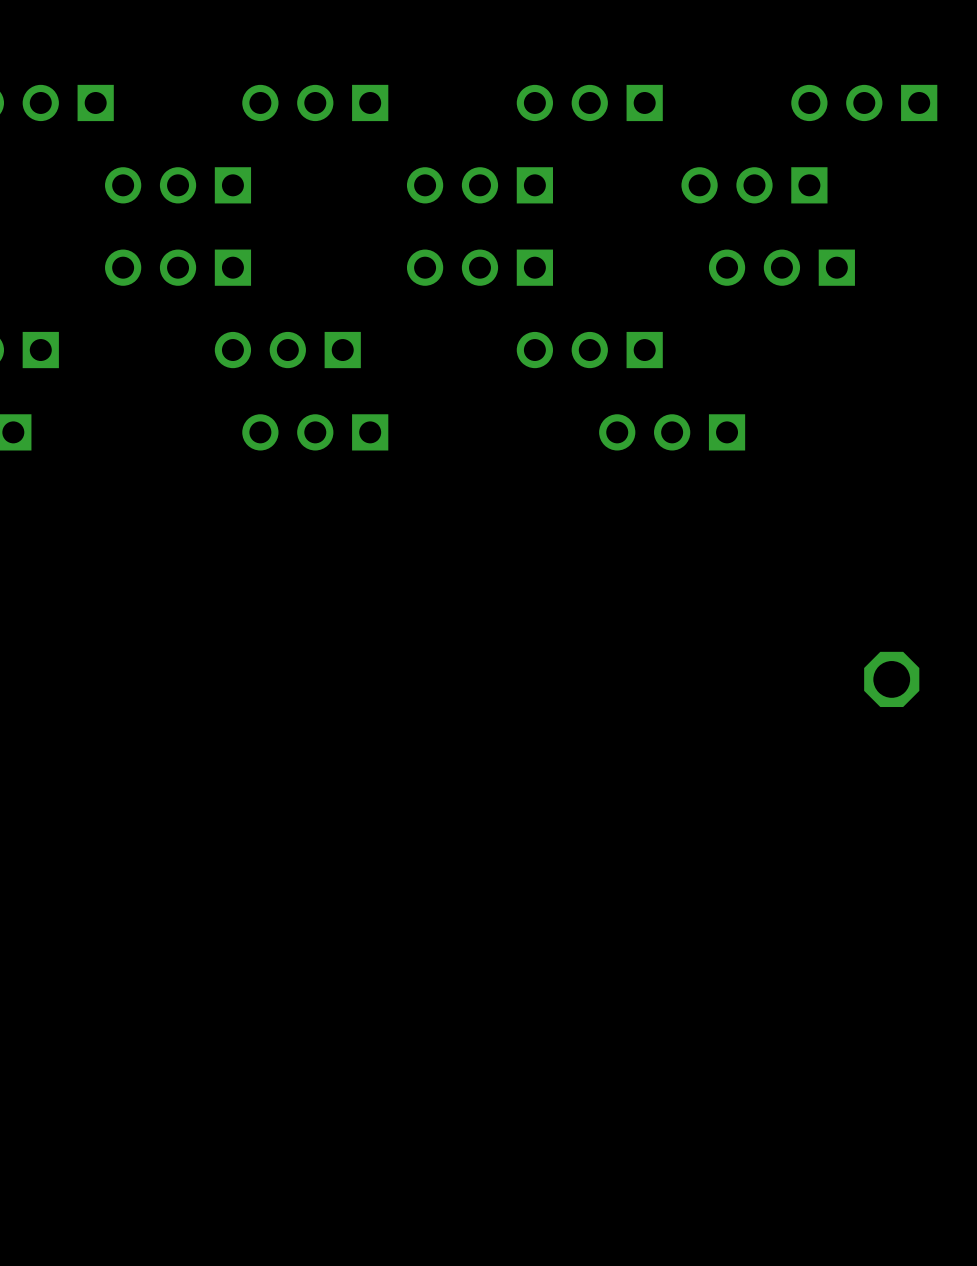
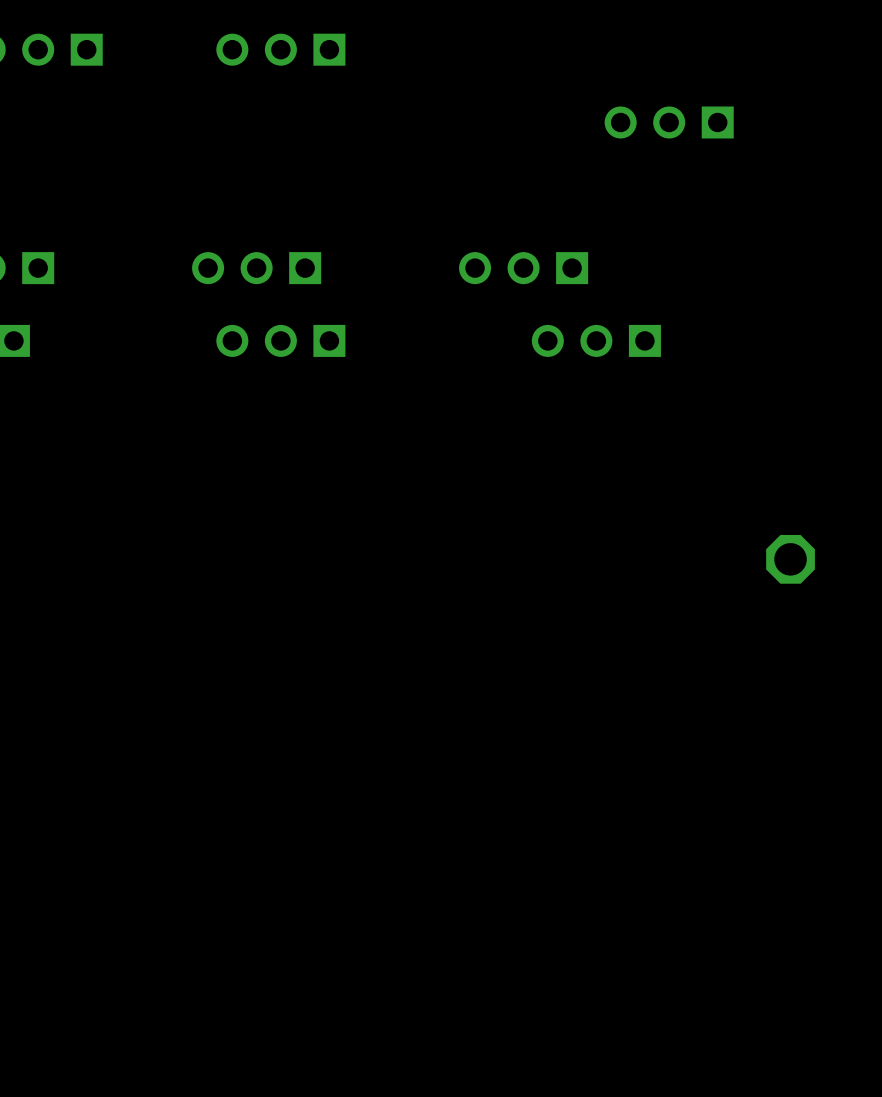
part: (589, 102) -> none
part: (864, 102) -> none
part: (178, 185) -> none
part: (479, 185) -> none
part: (178, 267) -> none
part: (479, 267) -> none
part: (781, 267) -> none

